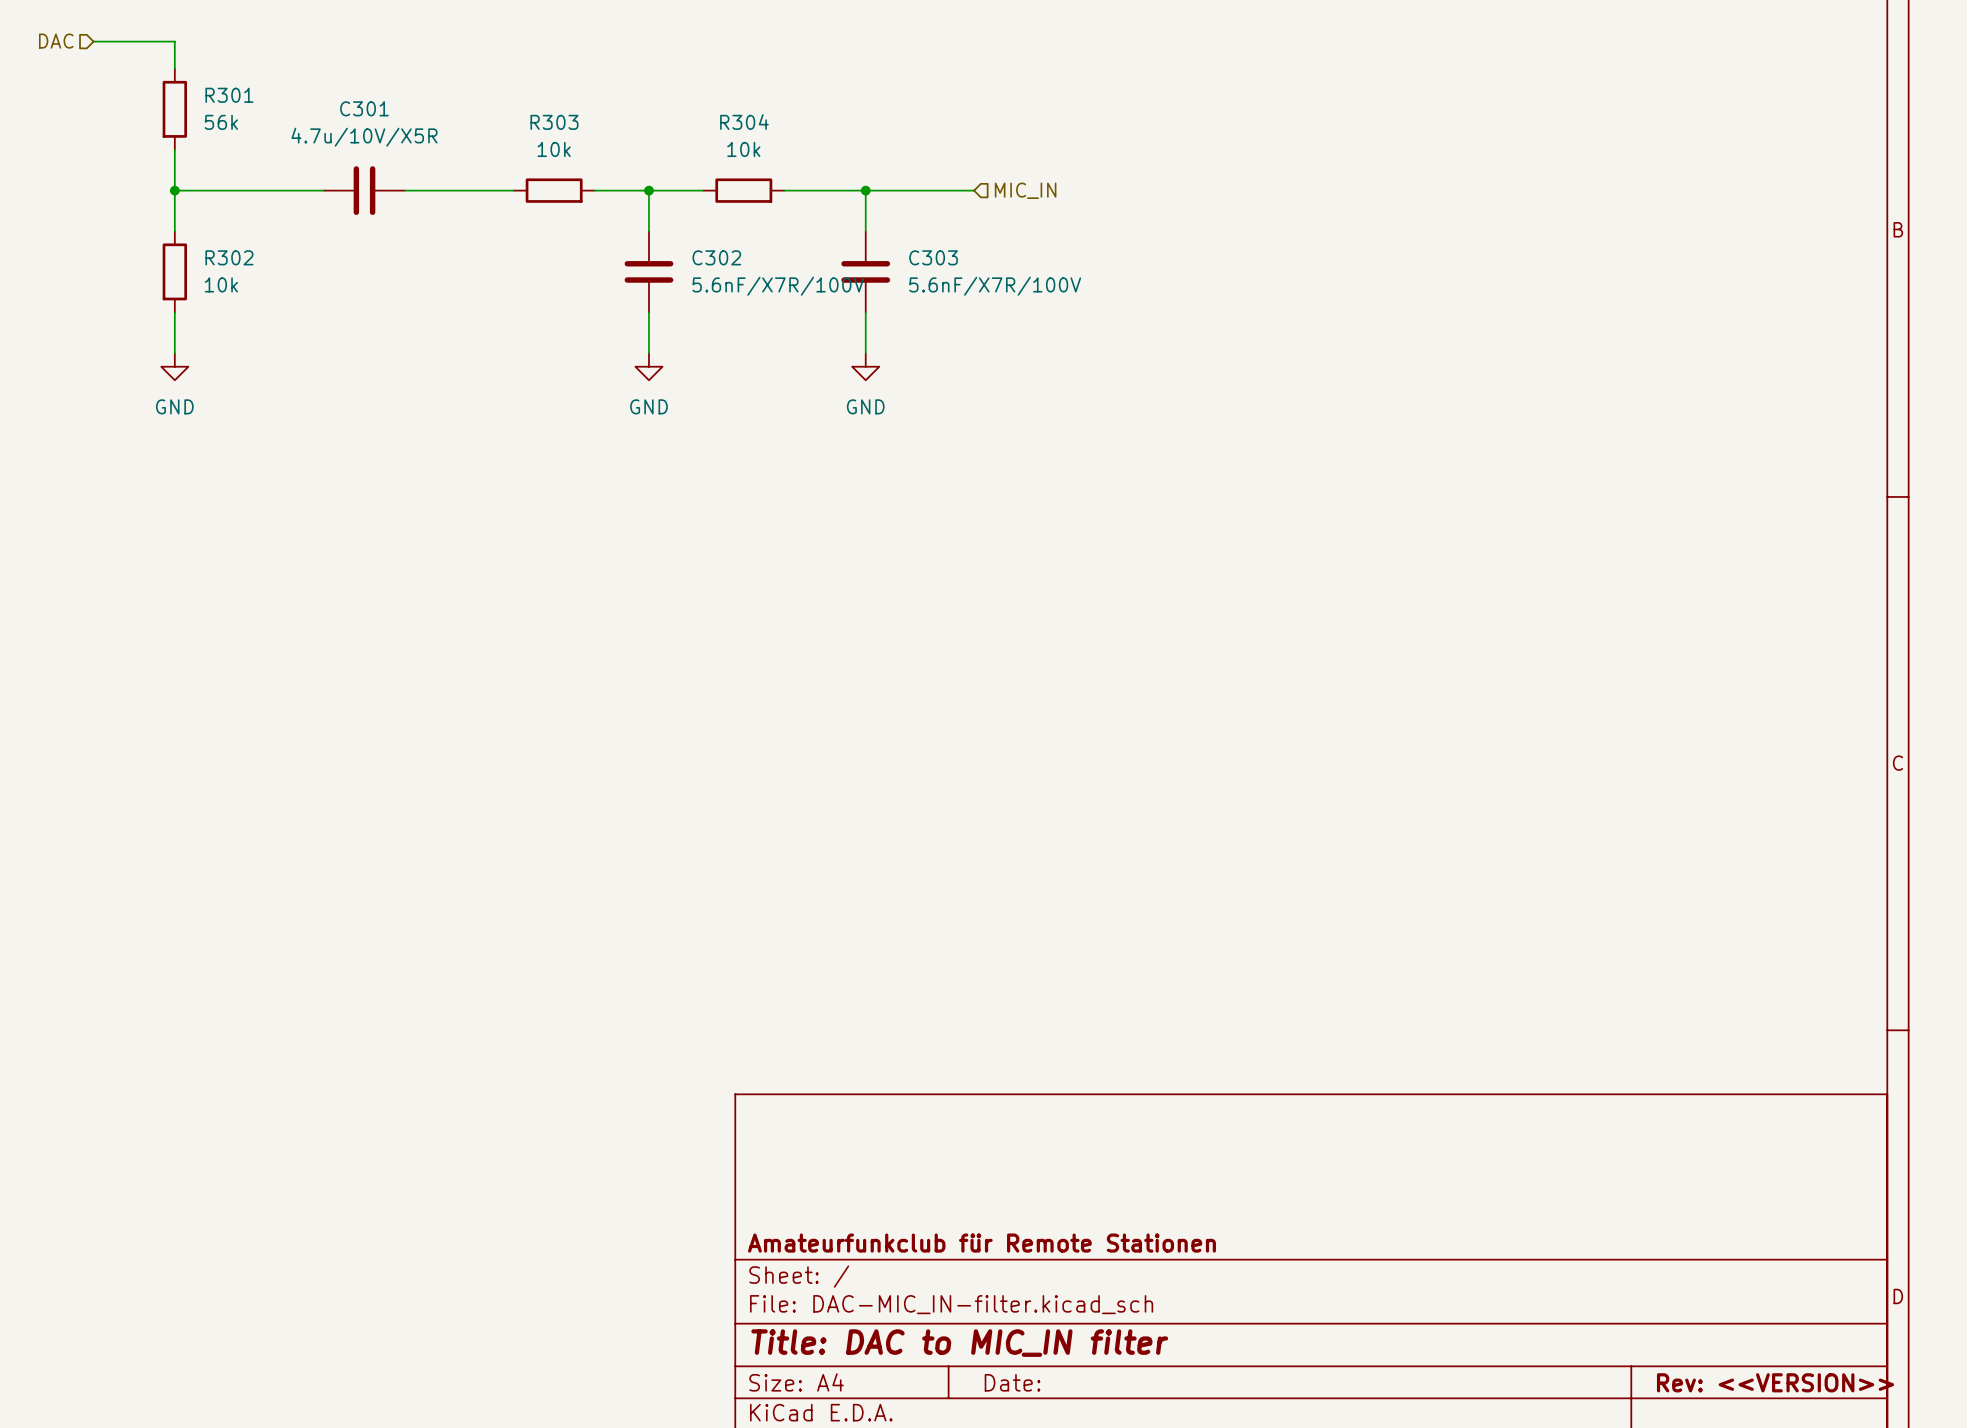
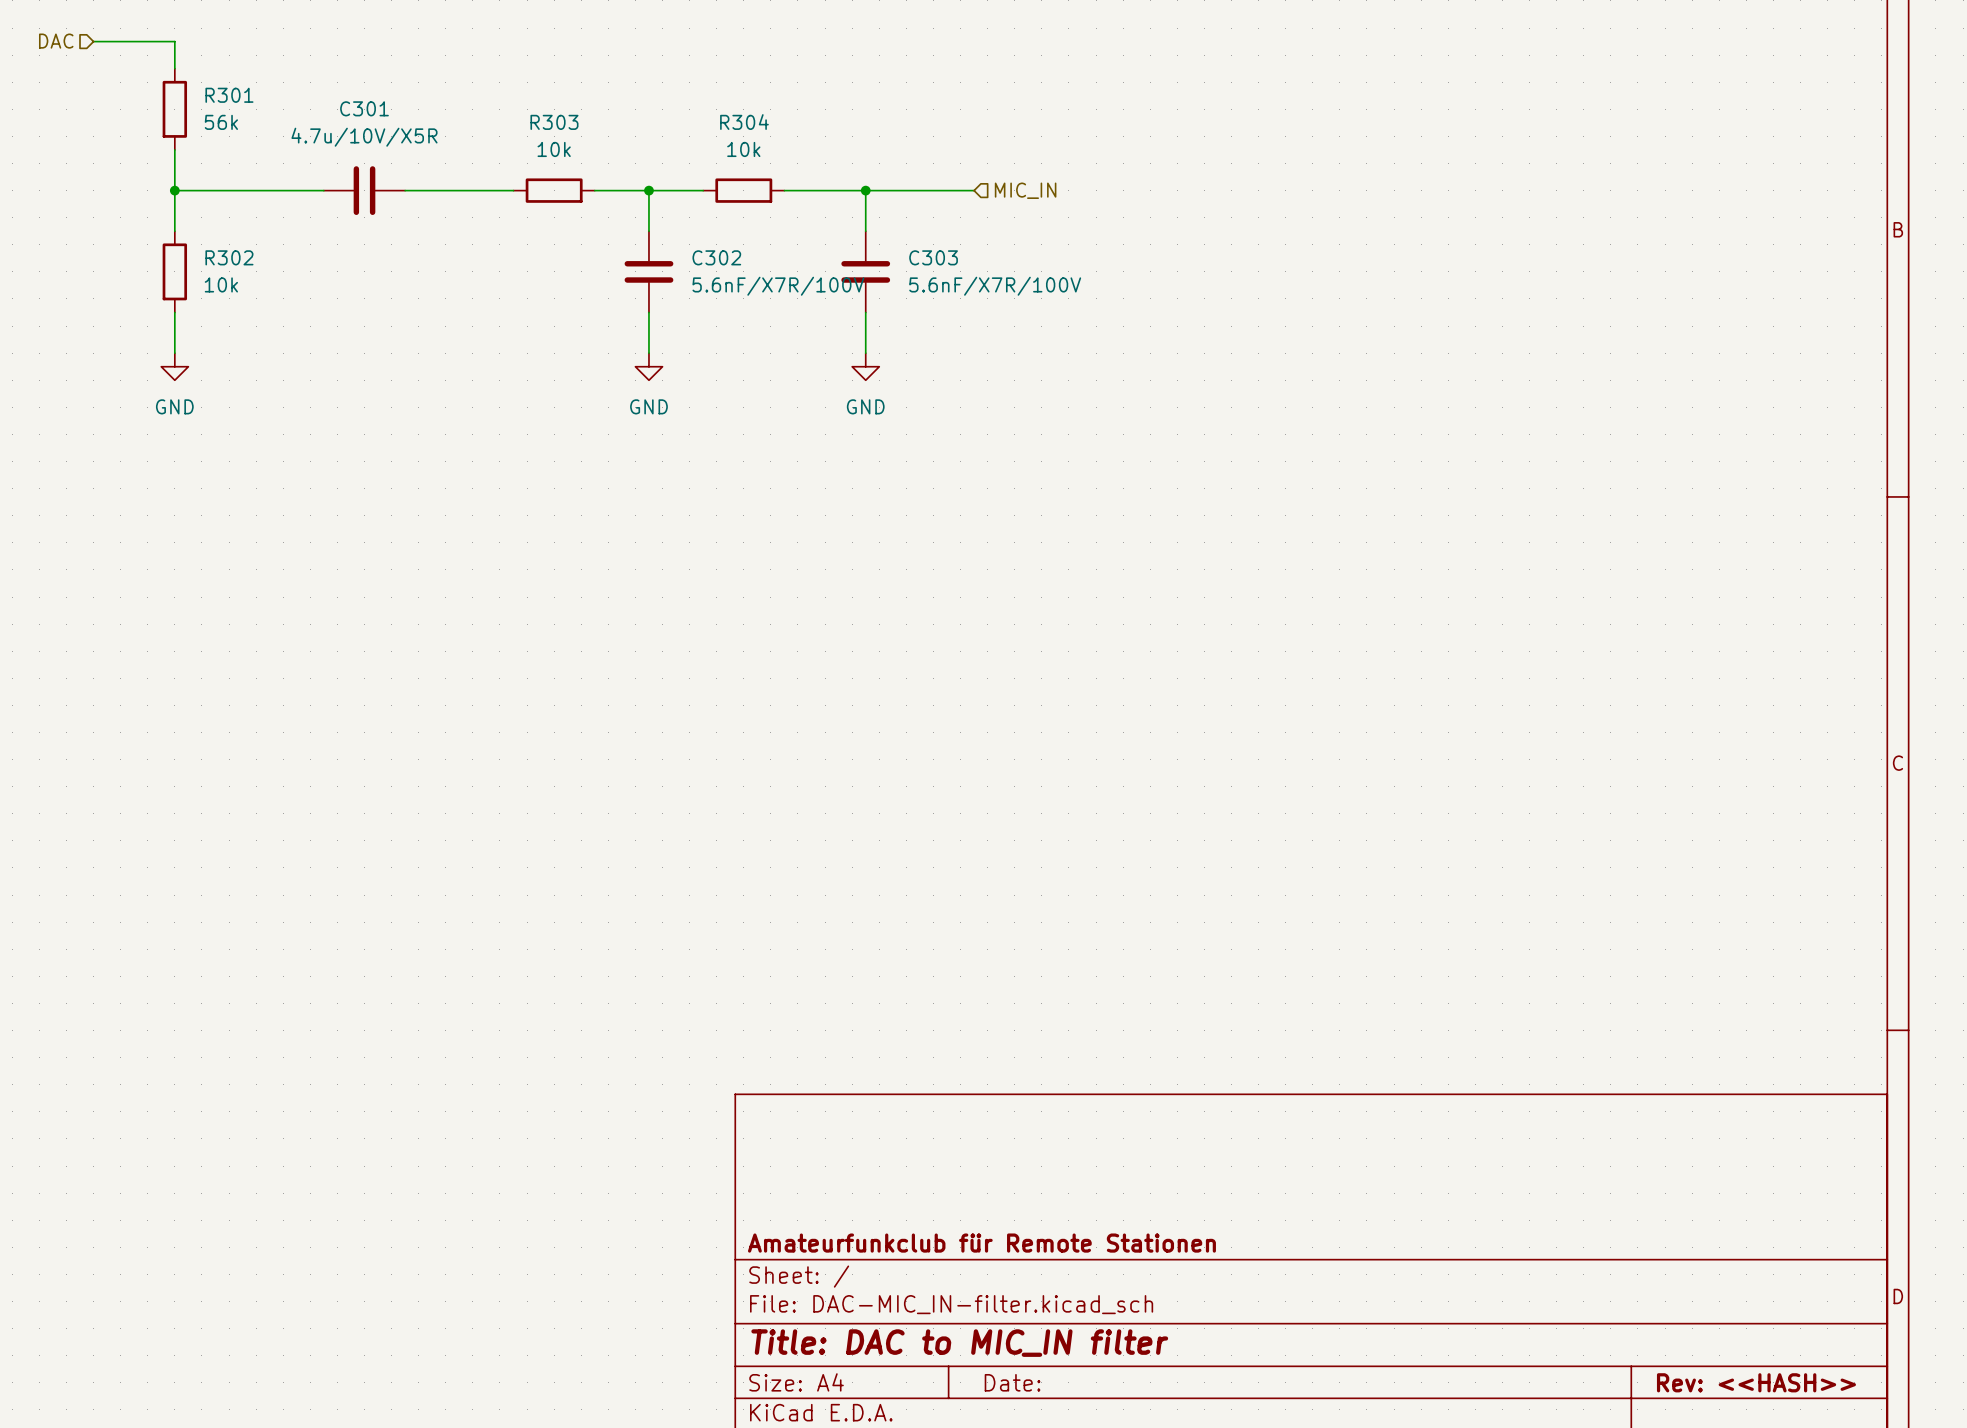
title block: Rev: <<VERSION>> (1775, 1382) -> Rev: <<HASH>> (1756, 1382)

